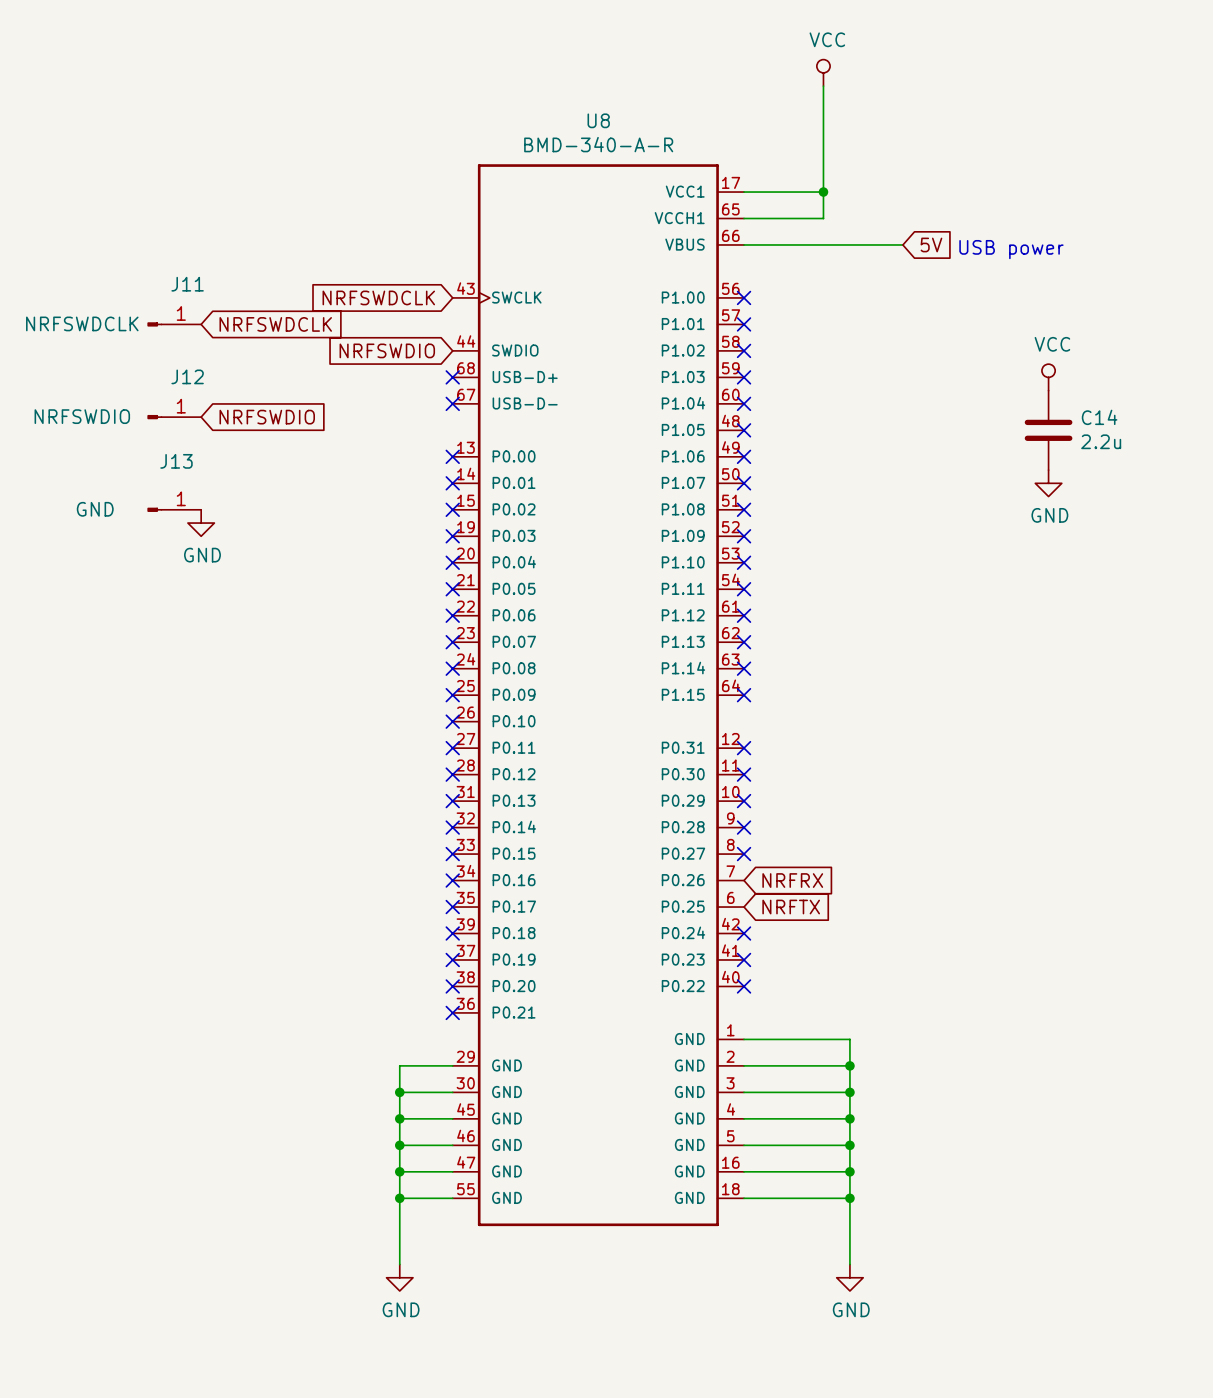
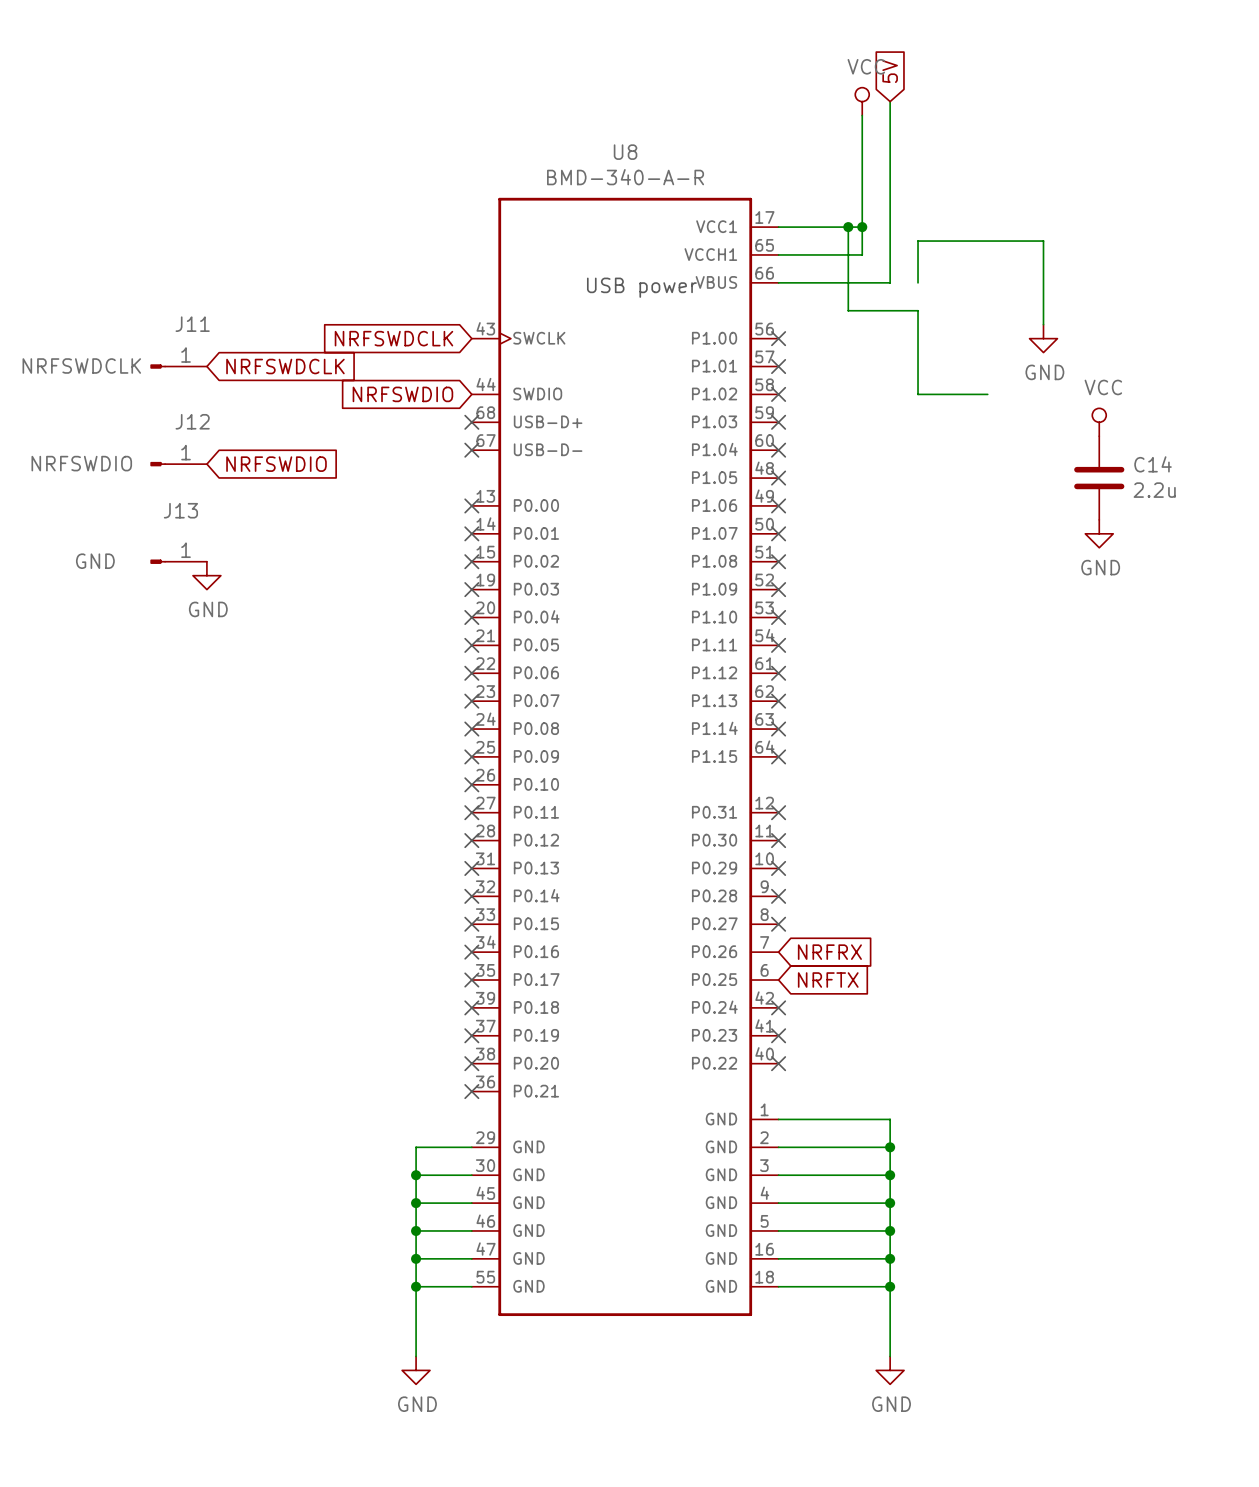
wire: none -> (848, 227) (848, 310) (918, 310) (918, 394) (987, 394)
junction: none -> (848, 227)
wire: (849, 244) (902, 244) -> (890, 282) (890, 101)
wire: none -> (918, 282) (918, 241) (1043, 241) (1043, 324)
global label rotation: 0° (931, 244) -> 90° counterclockwise (890, 71)
global label position: 5V (931, 244) -> 5V (890, 71)
text: none -> USB power (641, 287)
text: USB power (1011, 249) -> none
power symbol: none -> GND (1043, 338)

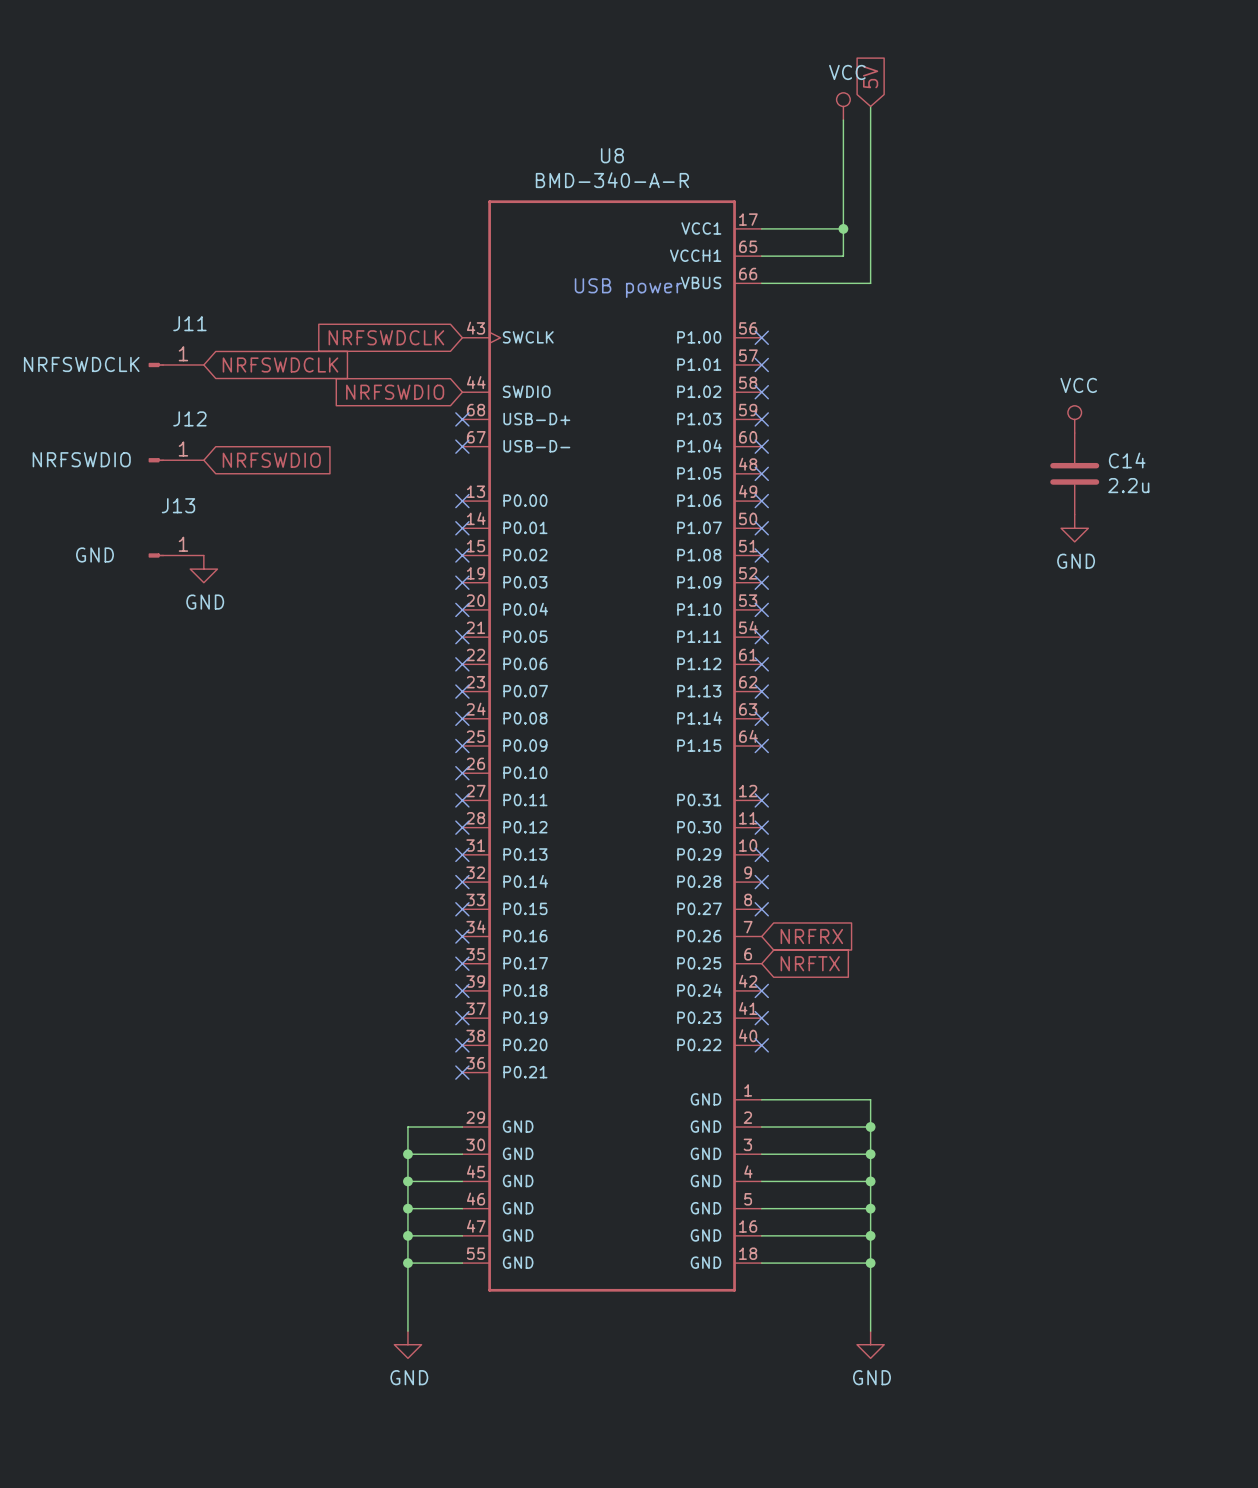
wire: (848, 227) (848, 310) (918, 310) (918, 394) (987, 394) -> none
junction: (848, 227) -> none
wire: (918, 282) (918, 241) (1043, 241) (1043, 324) -> none
power symbol: GND (1043, 338) -> none

